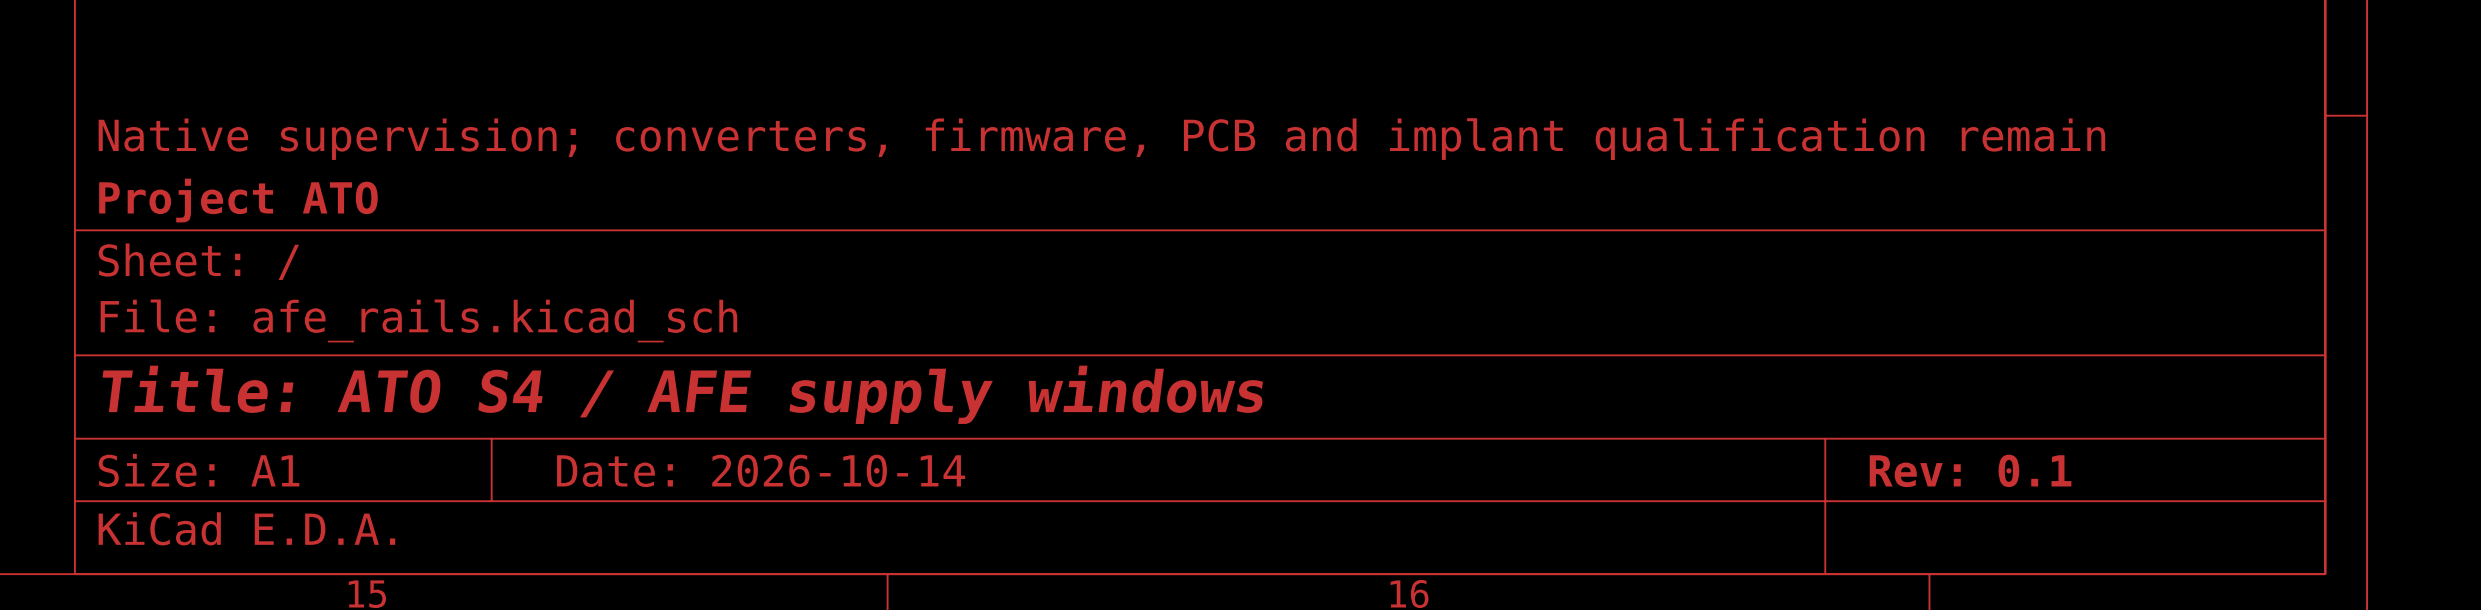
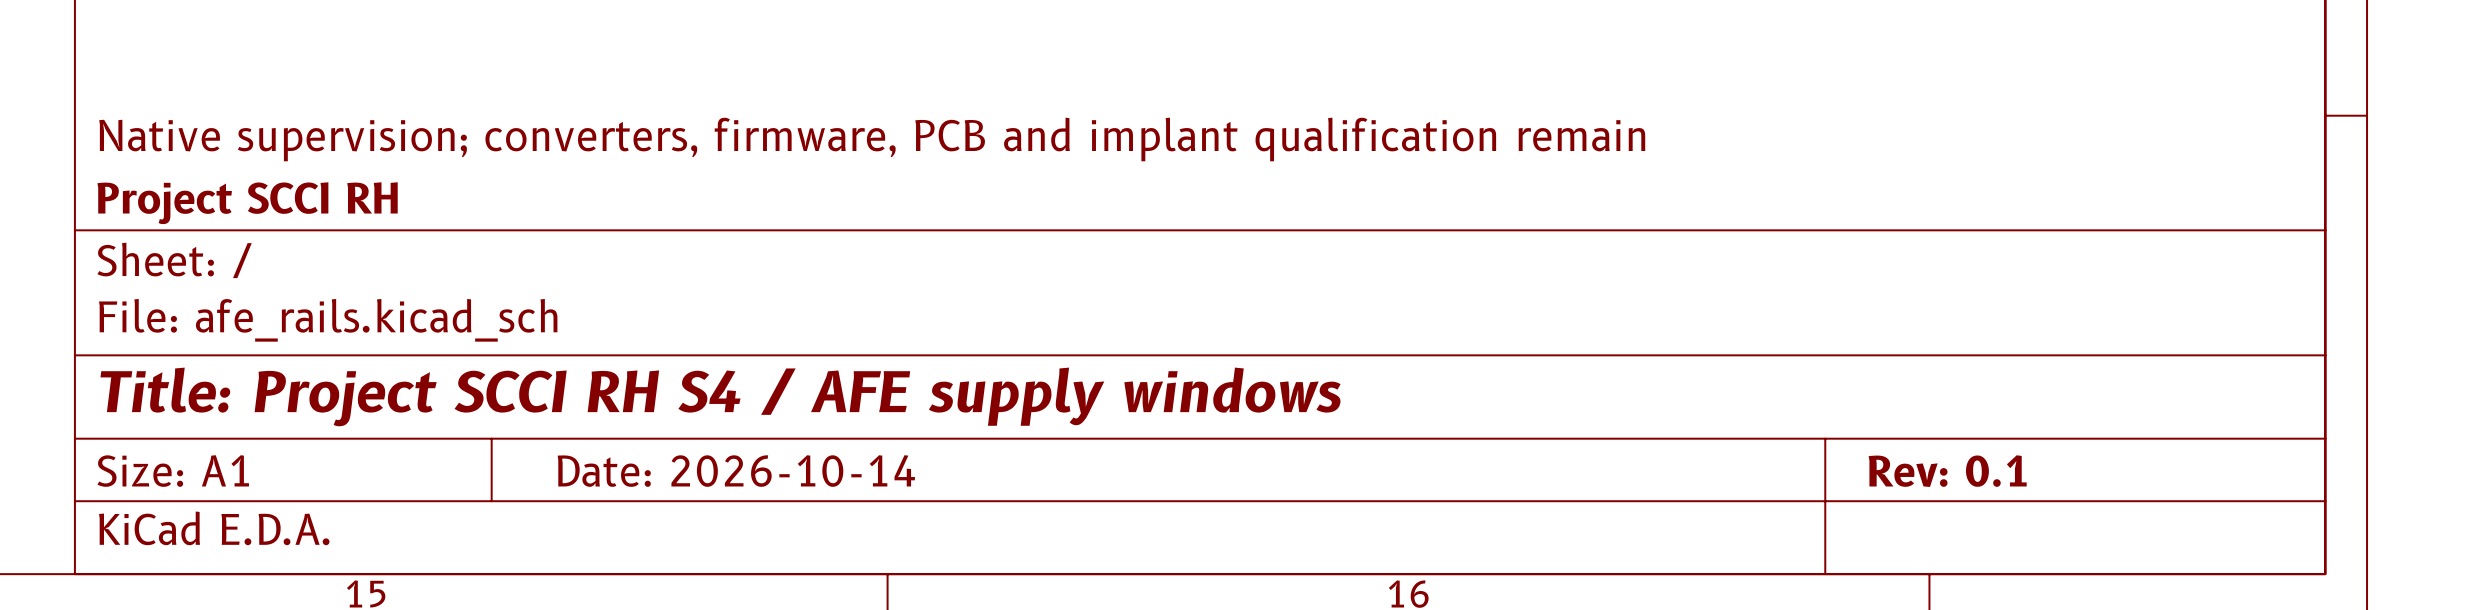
title block: Project ATO (238, 200) -> Project SCCI RH (247, 203)
title block: Title: ATO S4 / AFE supply windows (682, 394) -> Title: Project SCCI RH S4 / AFE supply windows (720, 396)

